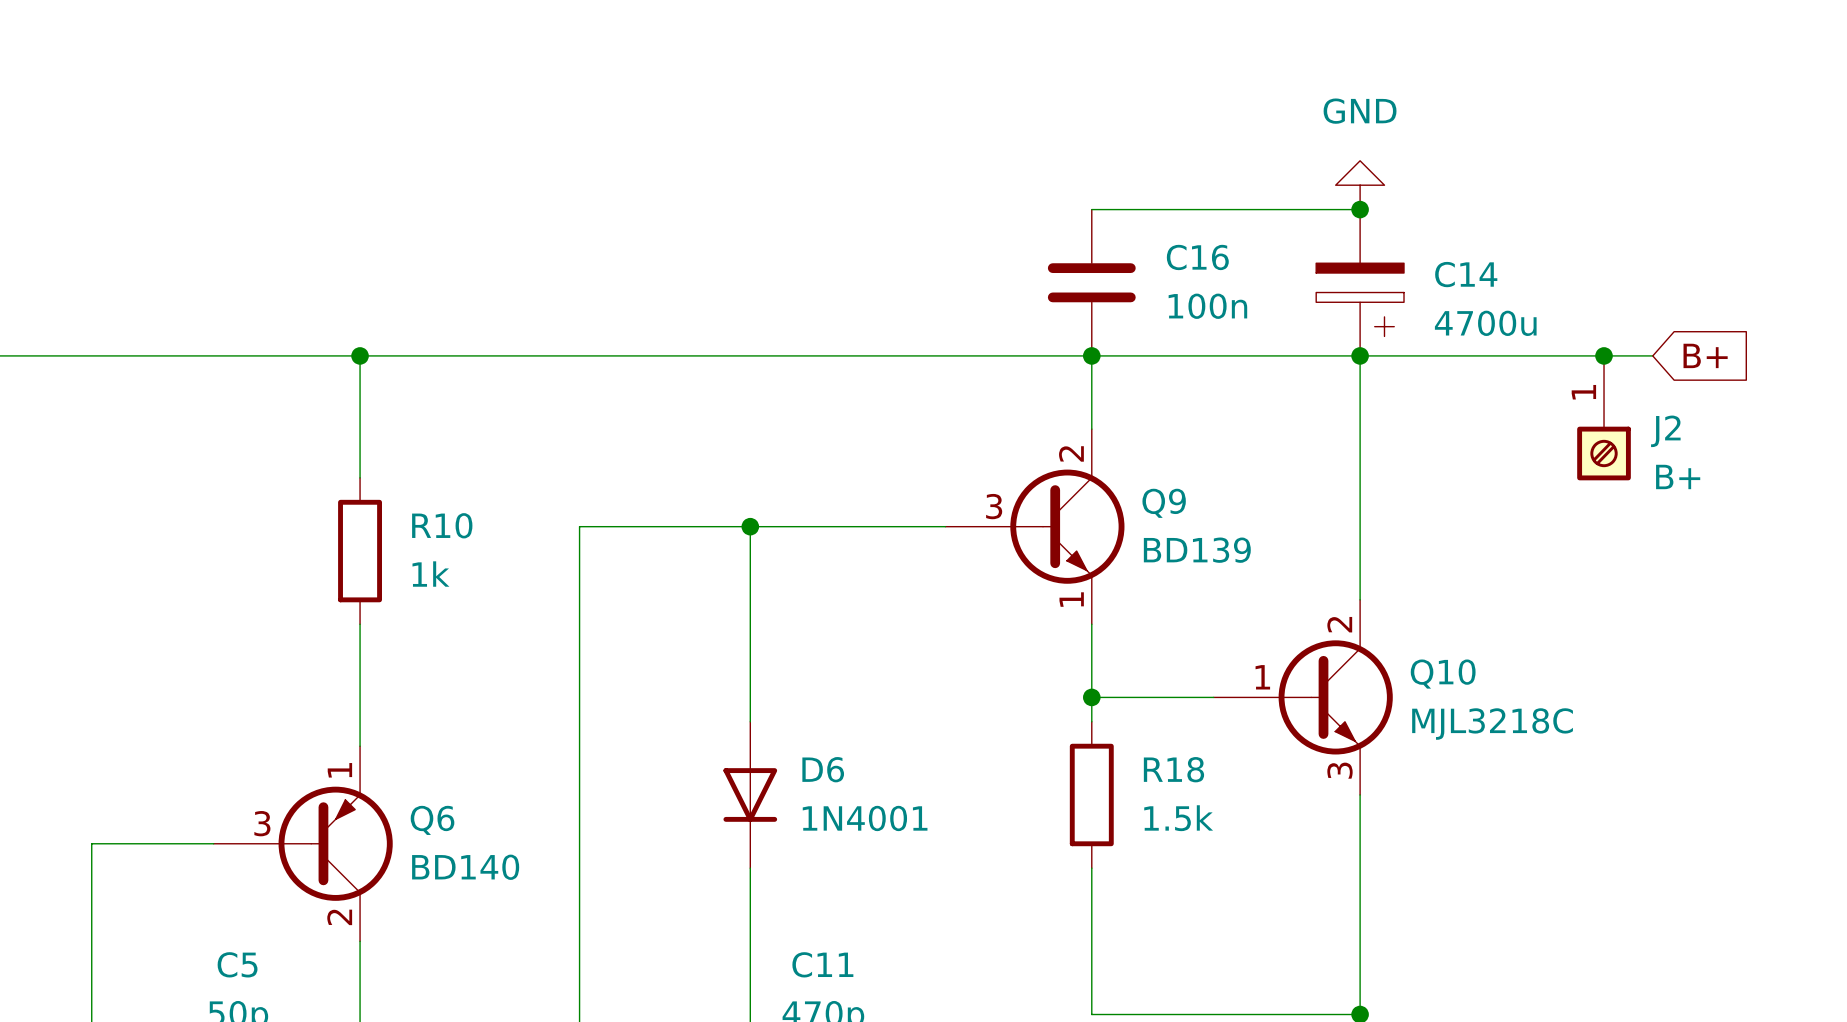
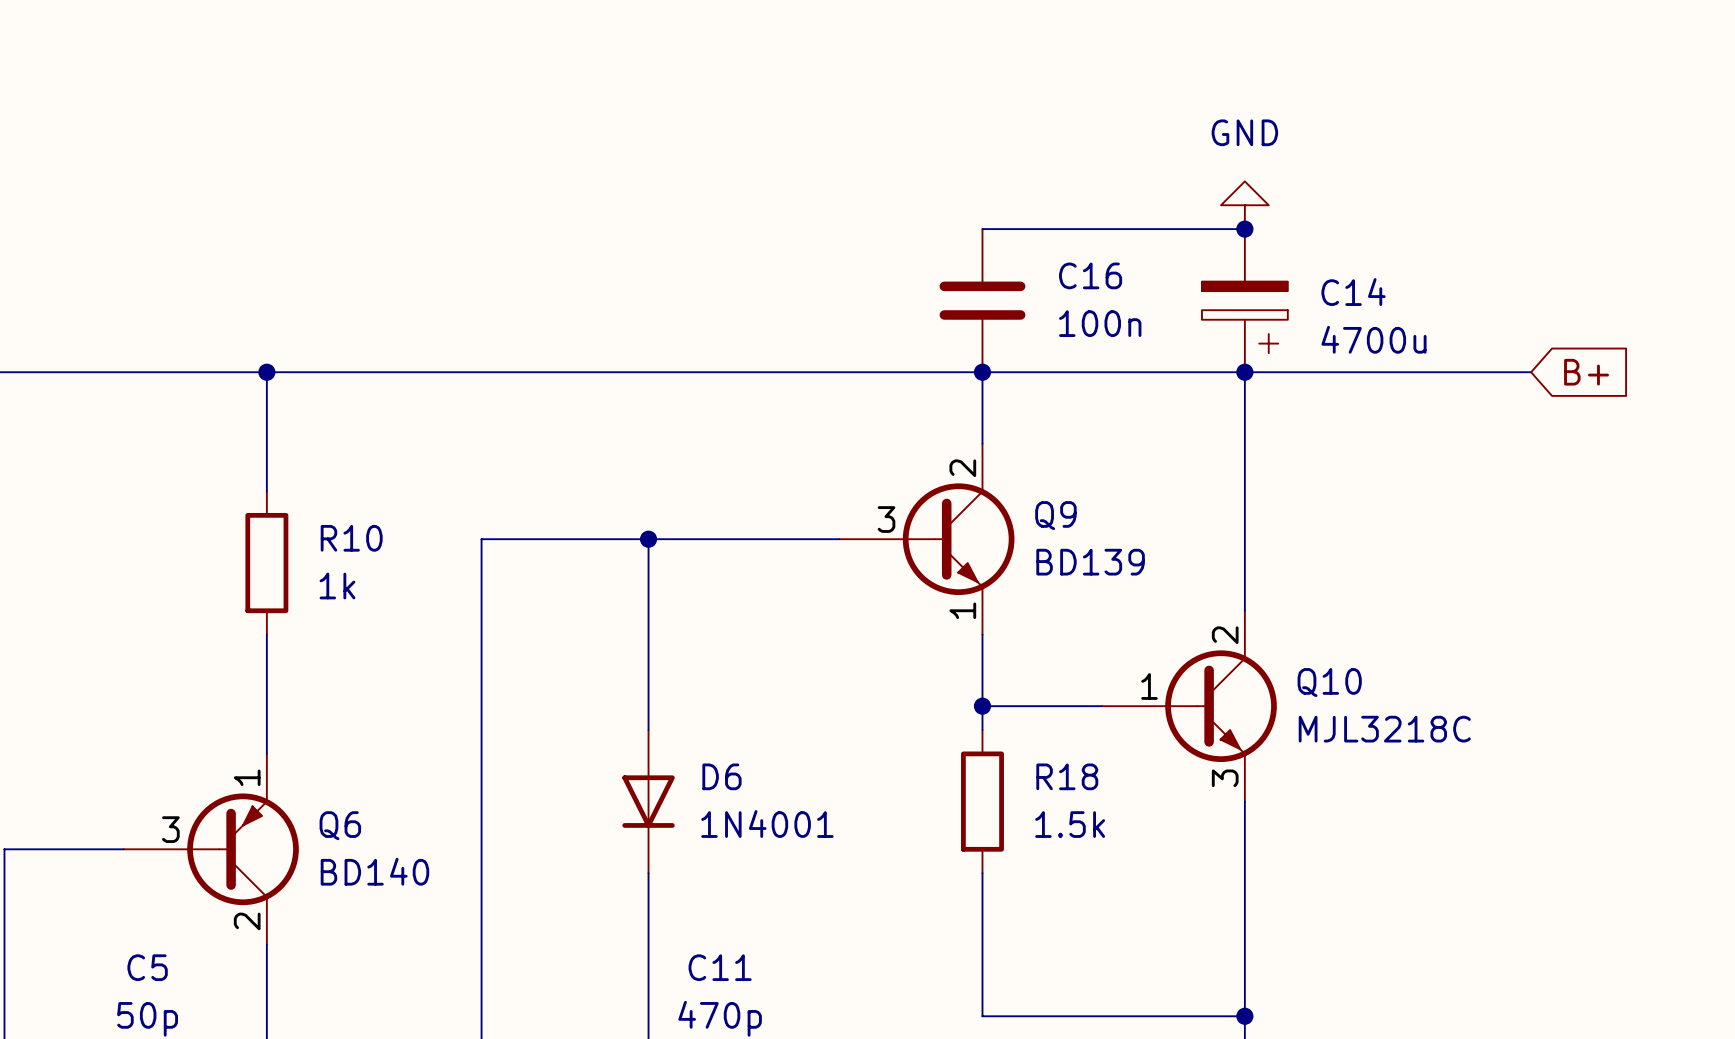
junction: (1604, 355) -> none
J2: B+ (1604, 418) -> none

